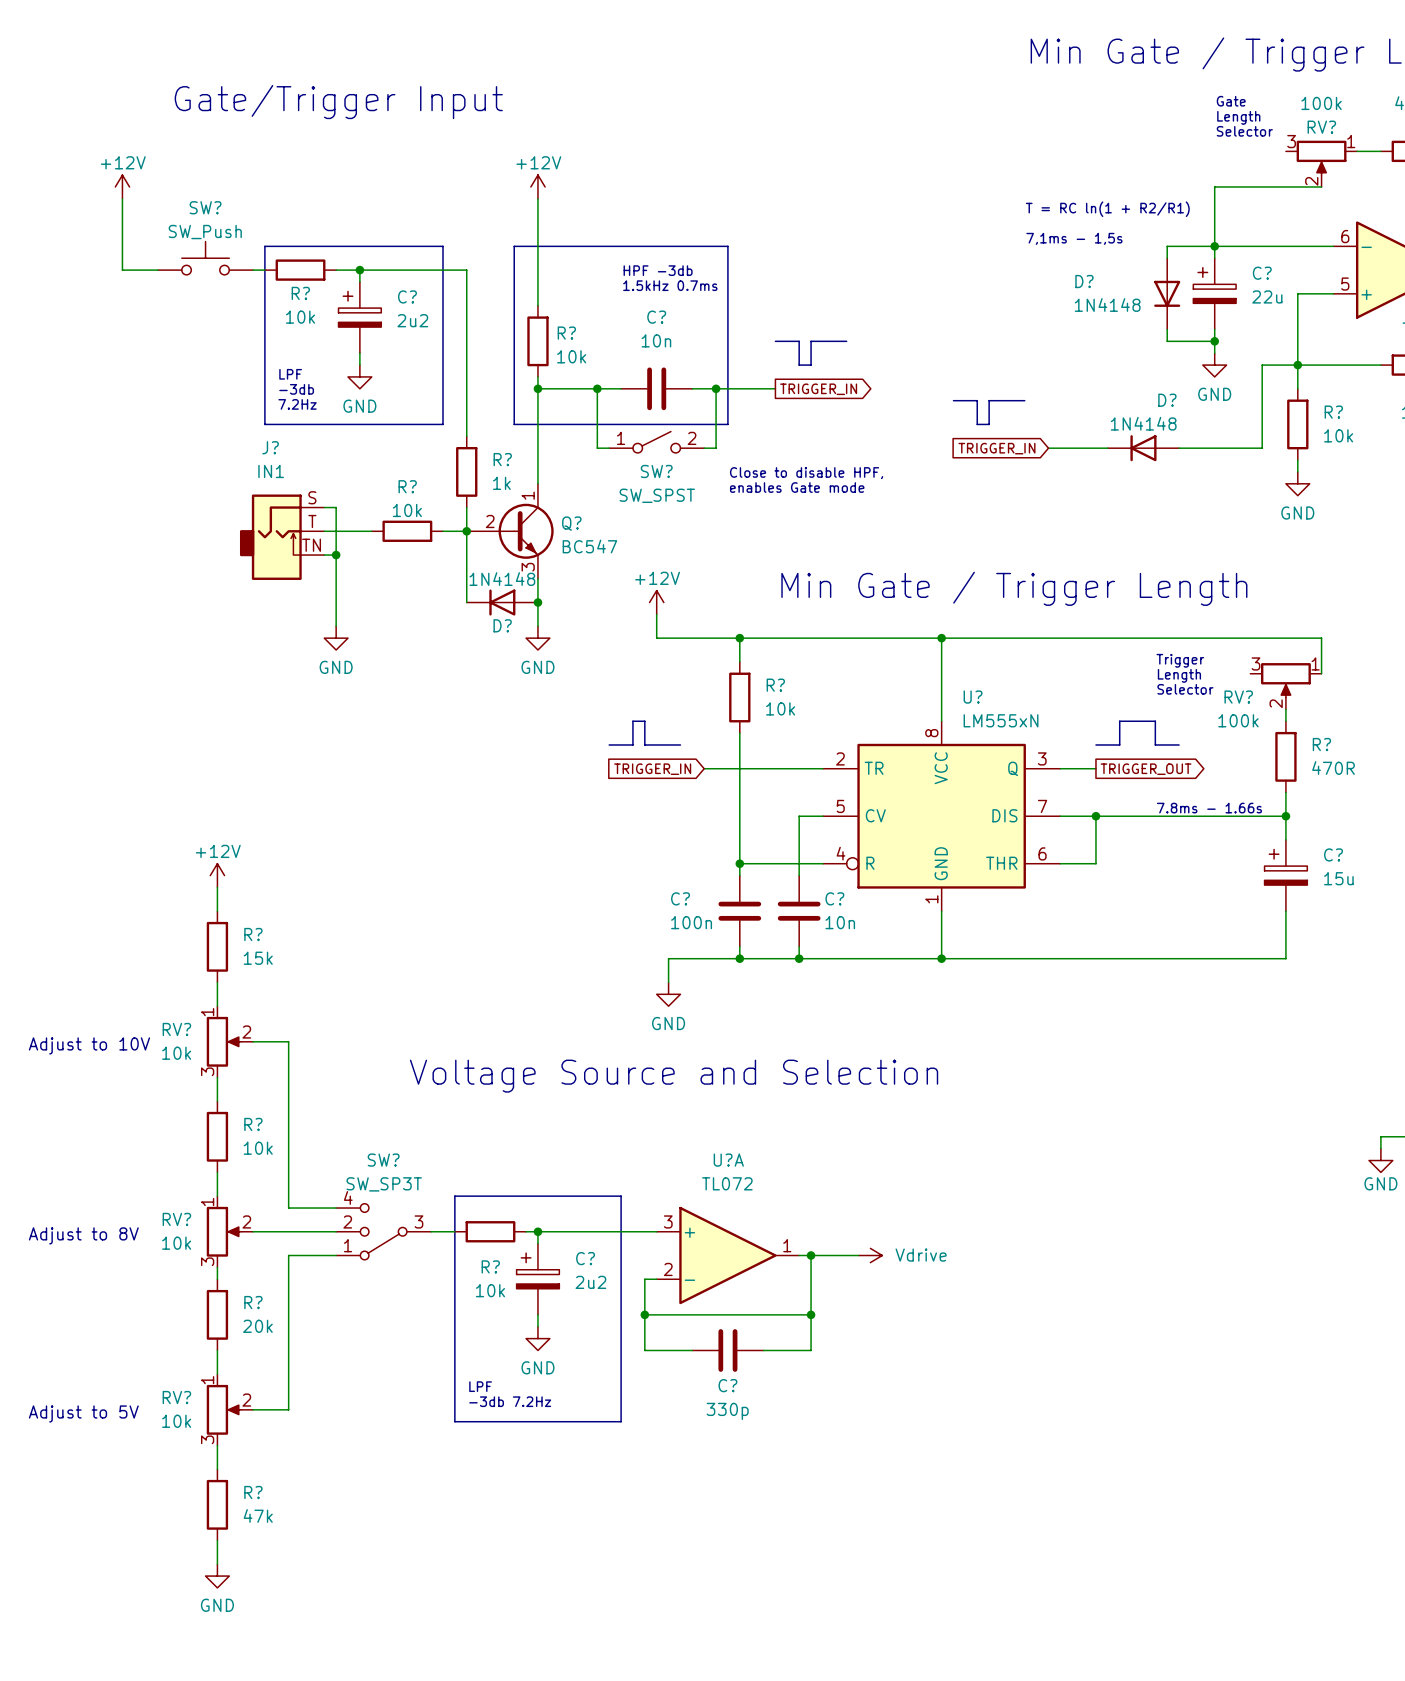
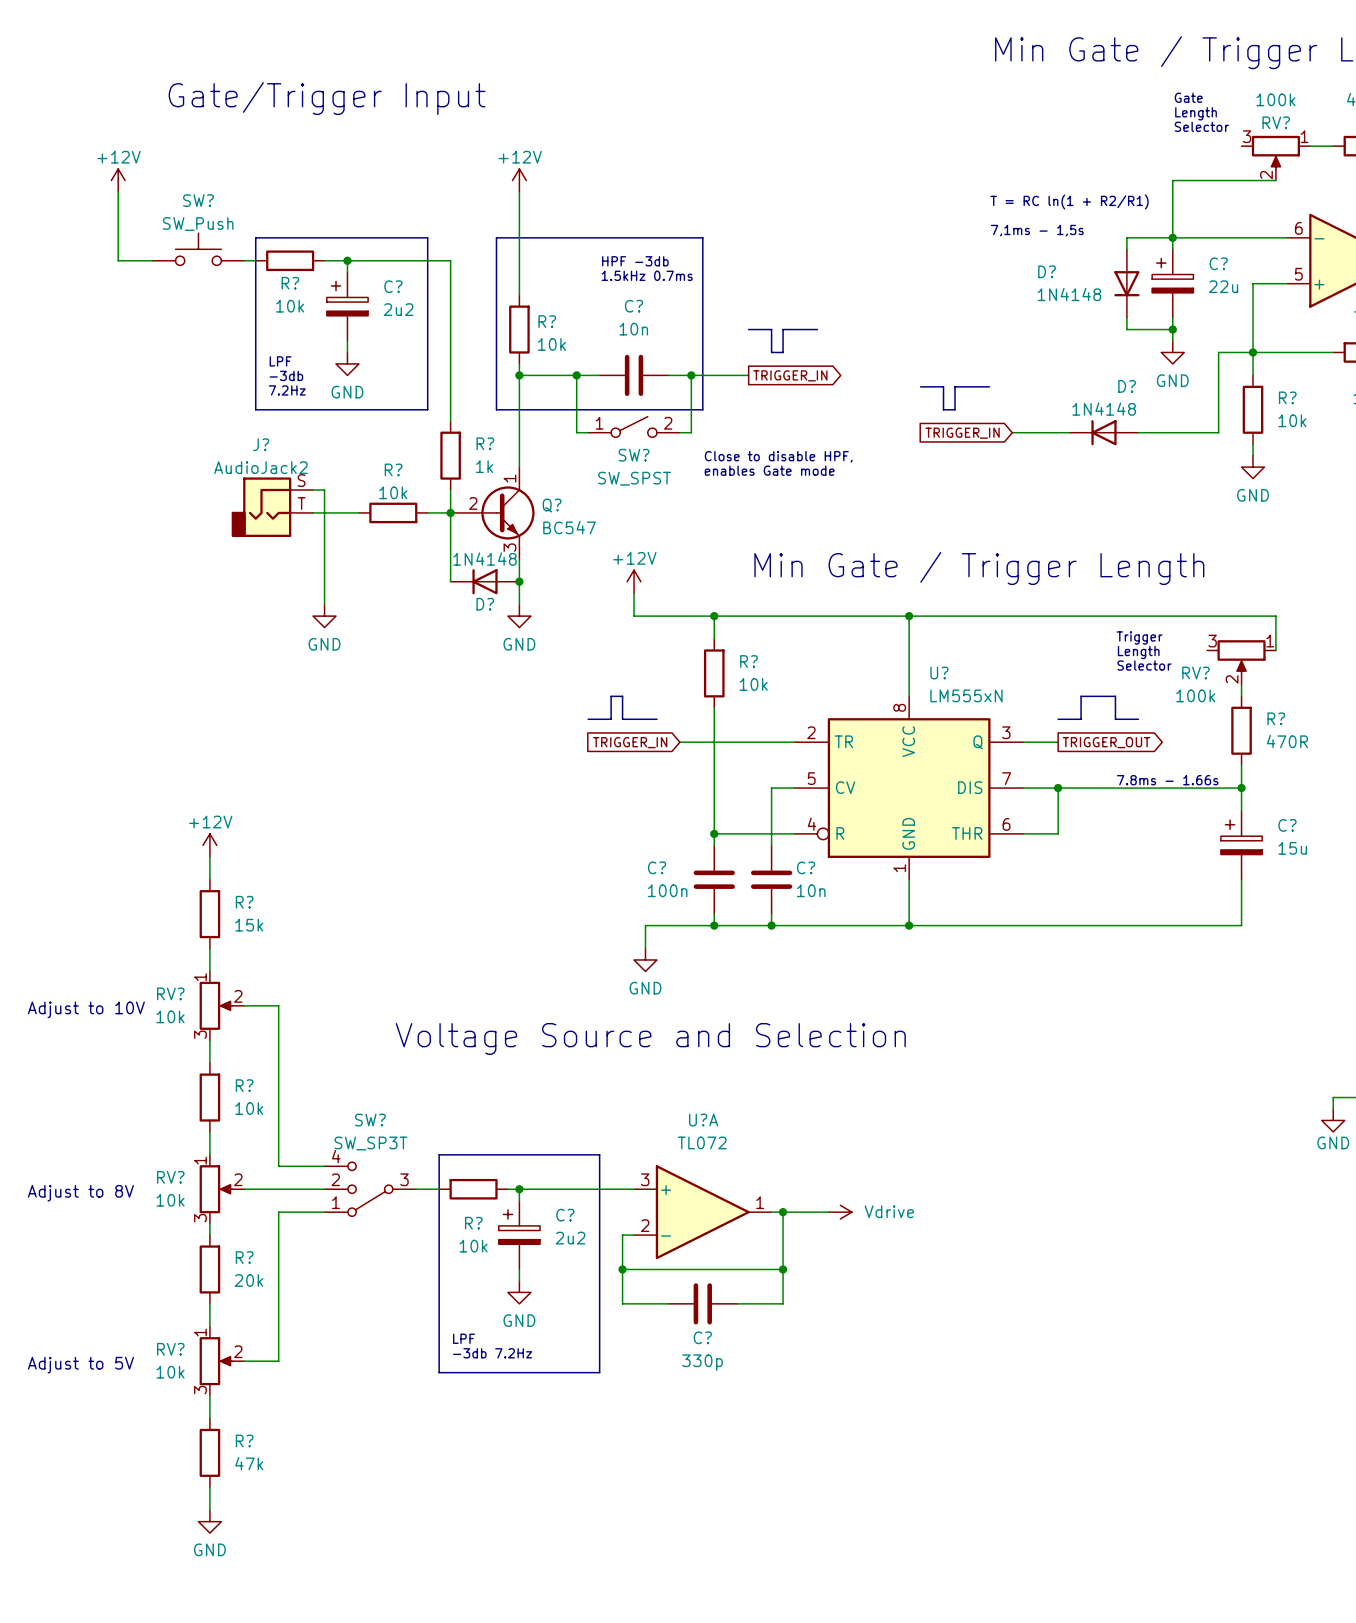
J?: none -> AudioJack2 (272, 507)
J?: IN1 (282, 537) -> none
wire: (324, 555) (336, 555) -> none
junction: (336, 555) -> none

